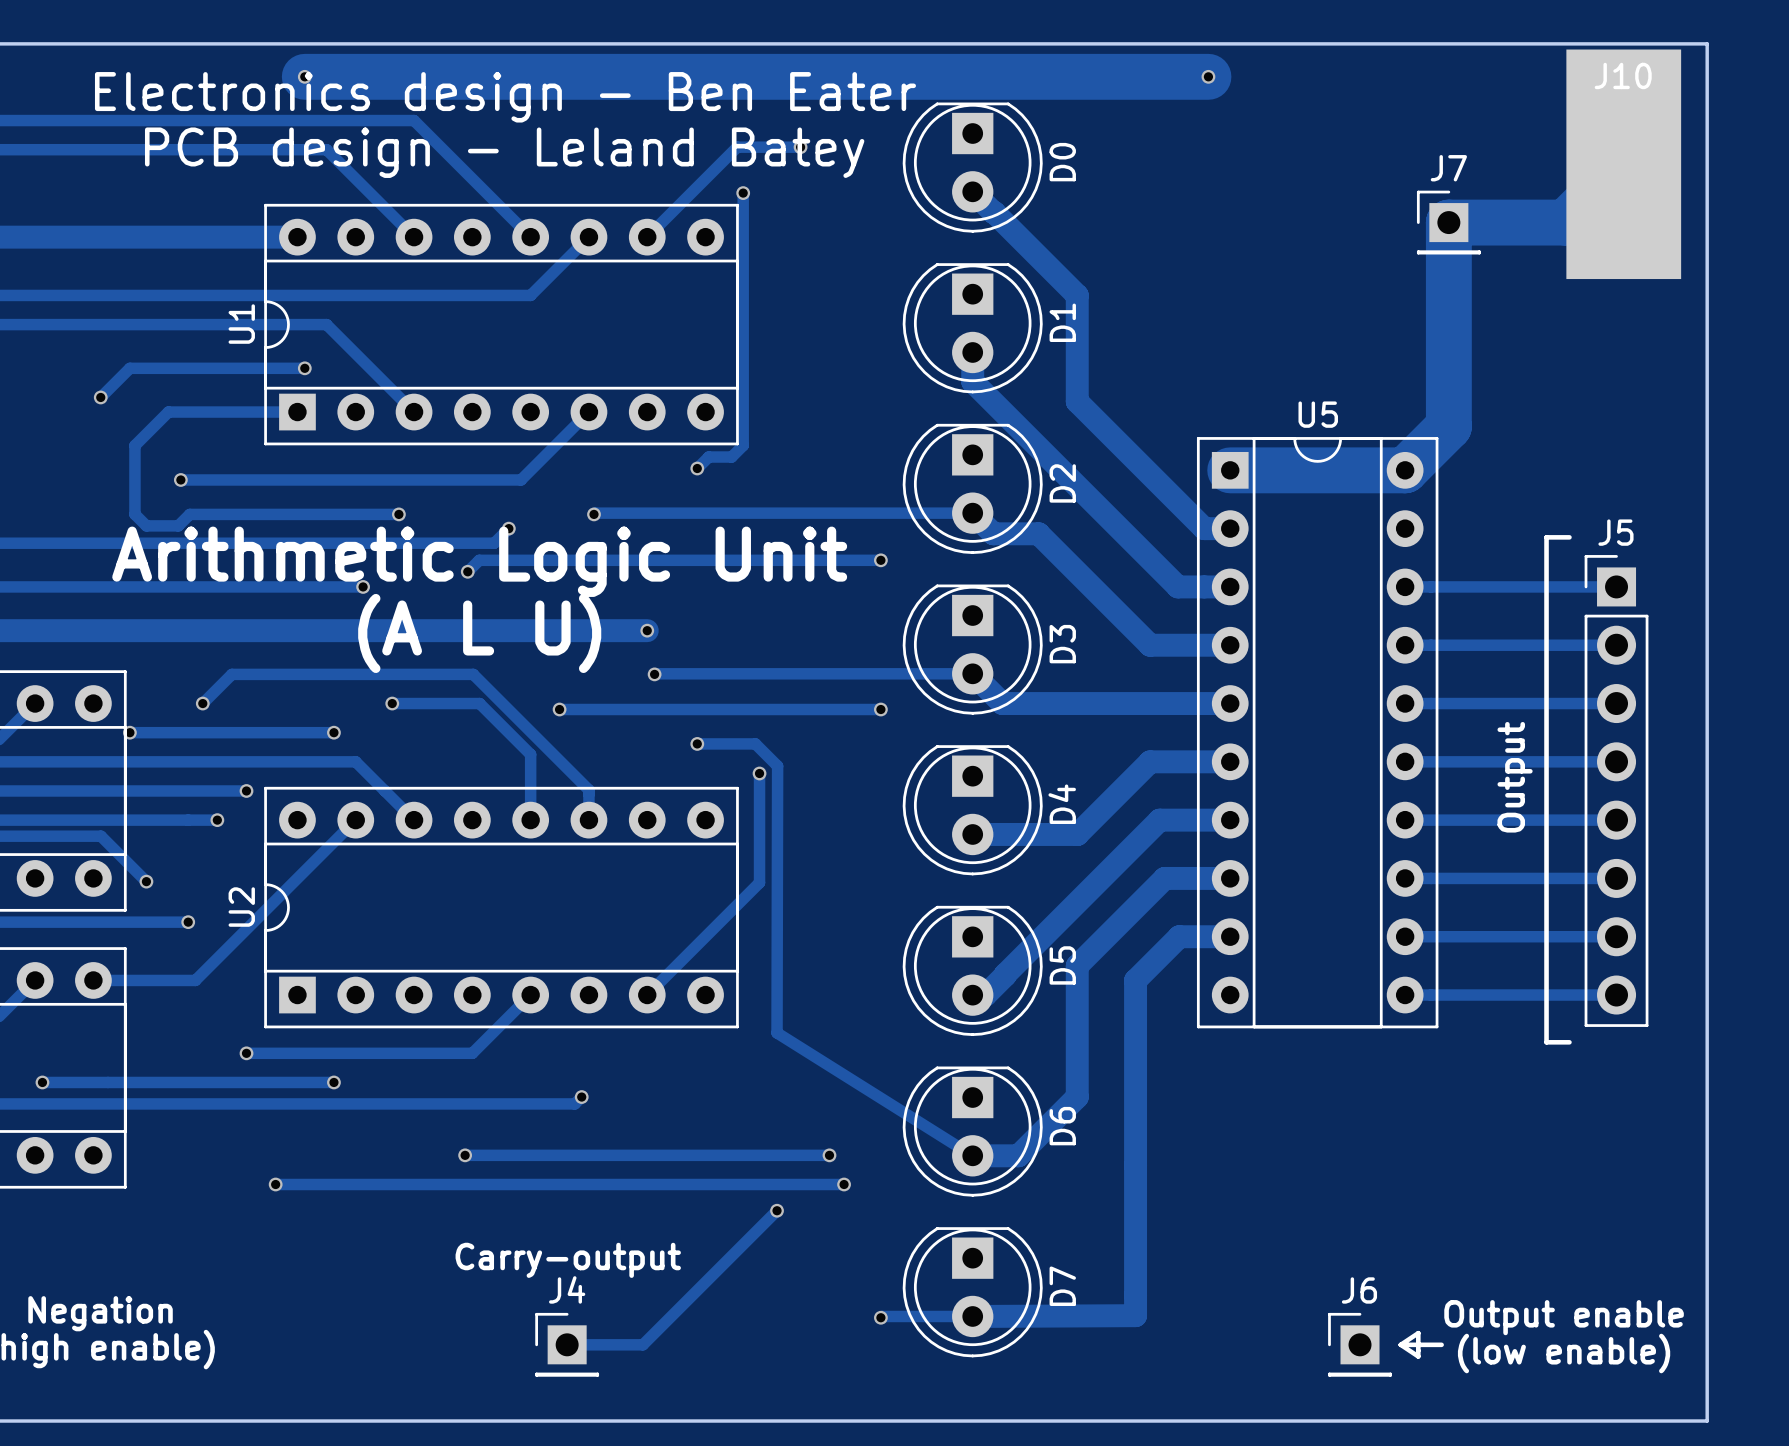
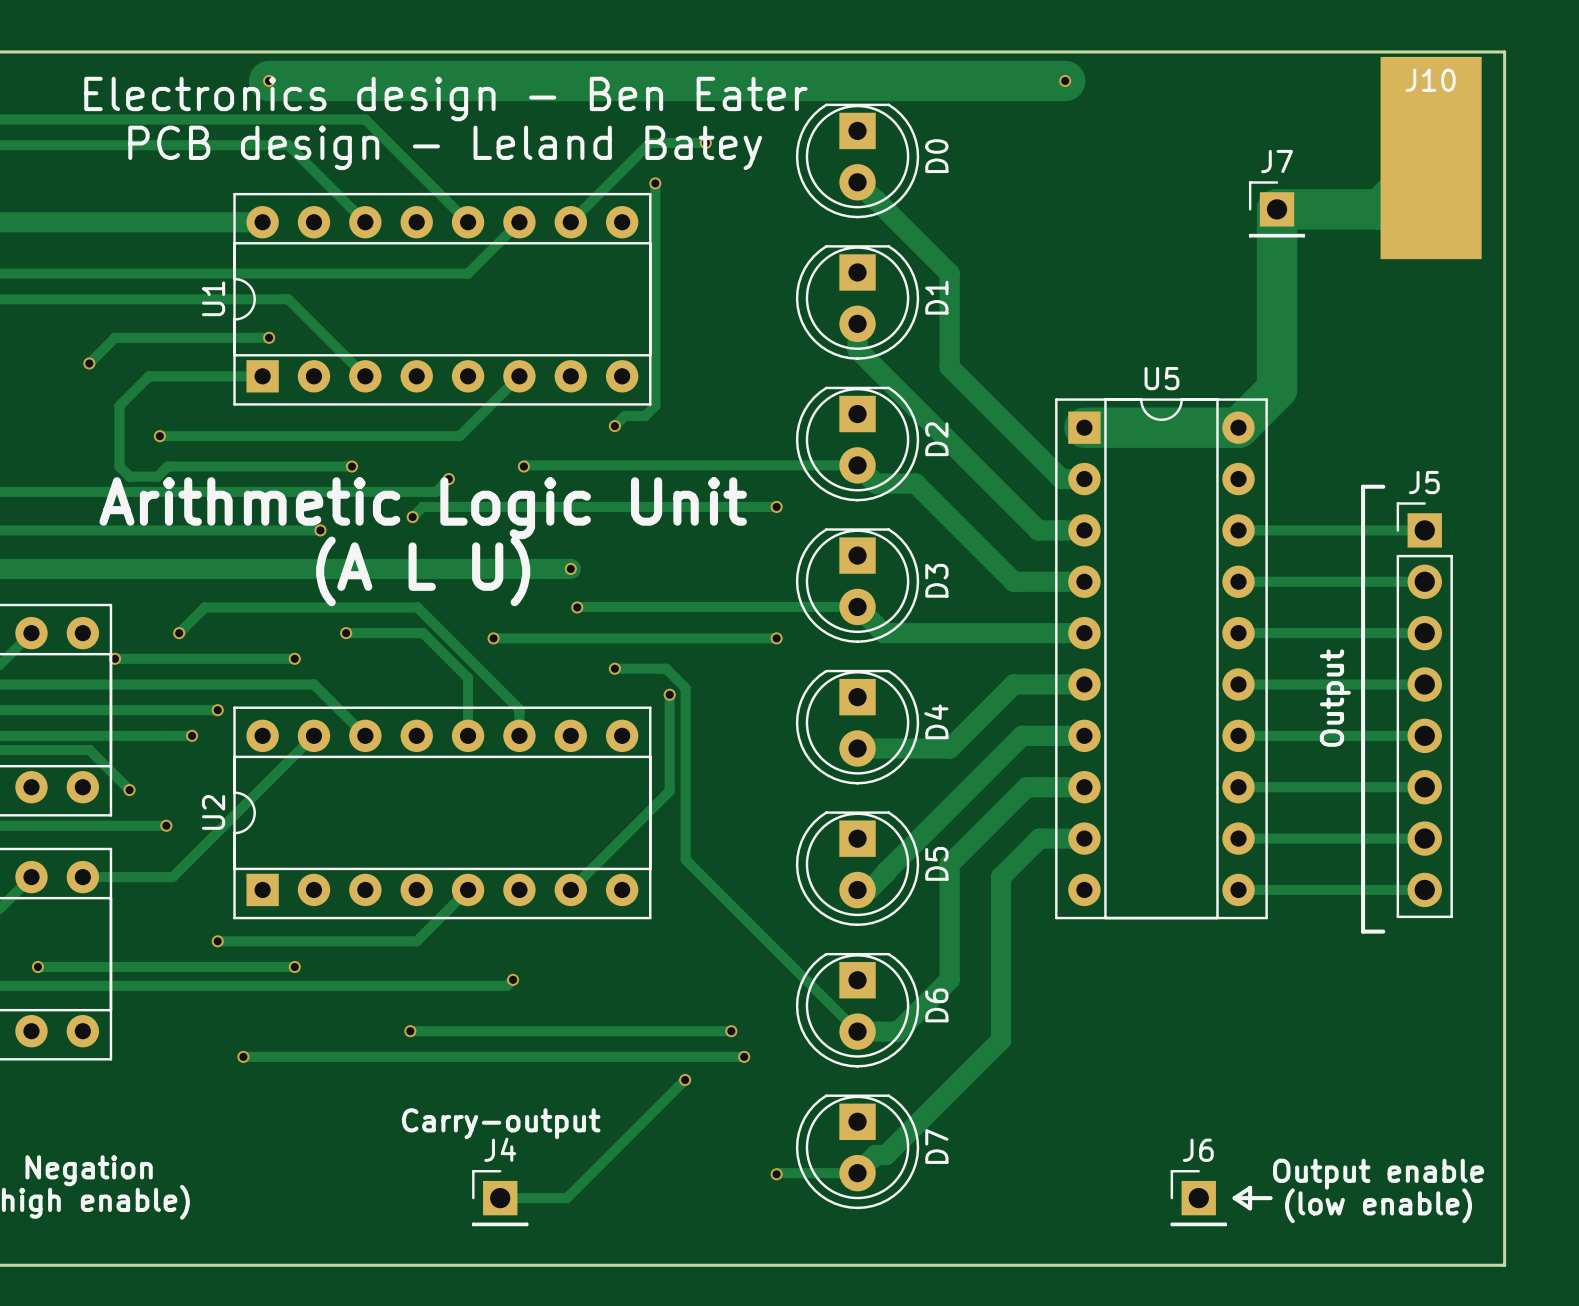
track: (777, 766) (777, 1032) (972, 1155) -> (685, 688) (685, 859) (857, 1031)
track: (1135, 1165) (1135, 1315) (972, 1316) -> (1001, 1040) (886, 1154) (875, 1154) (857, 1173)

